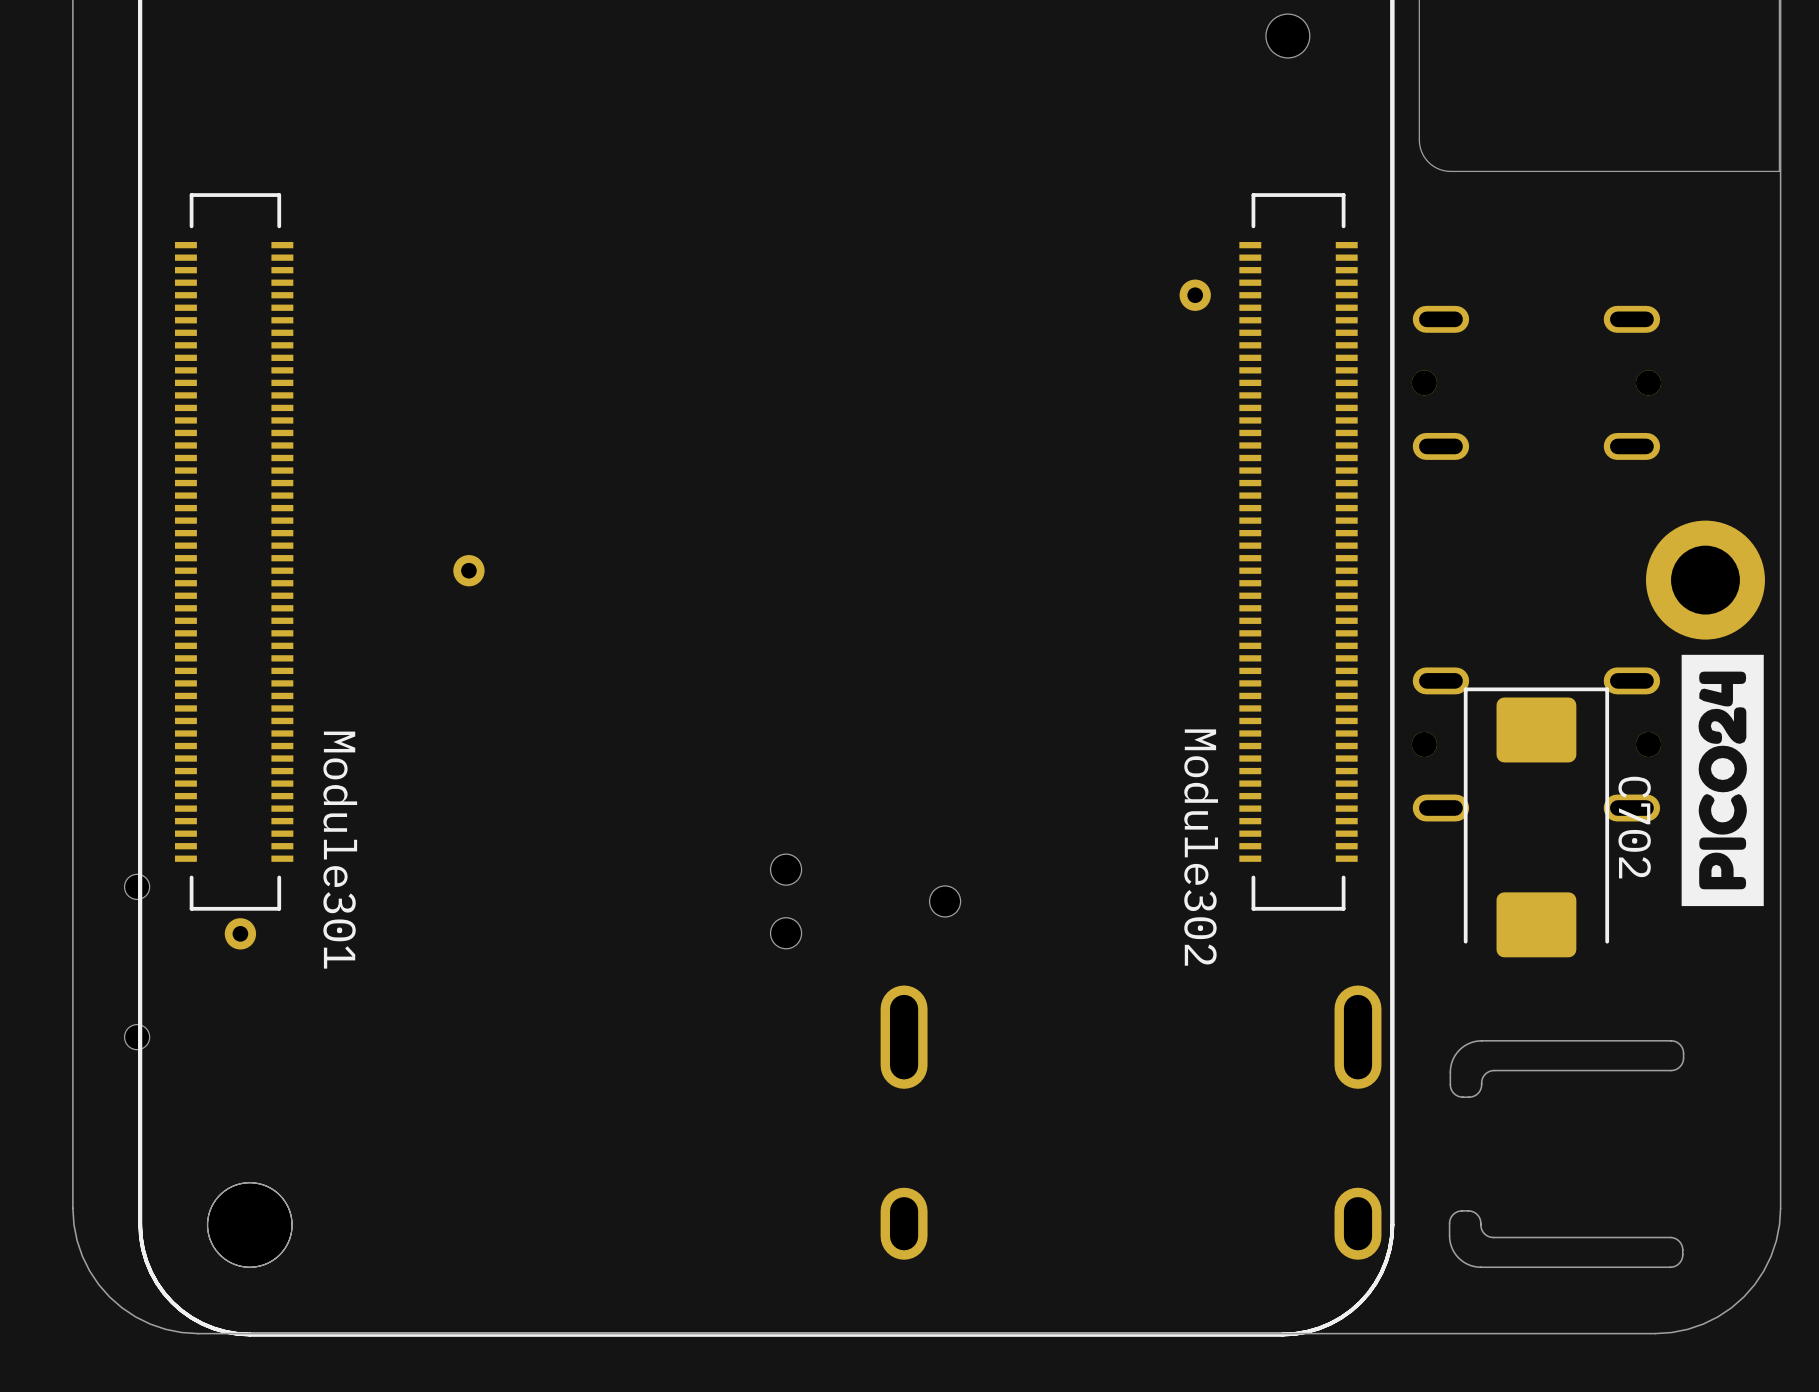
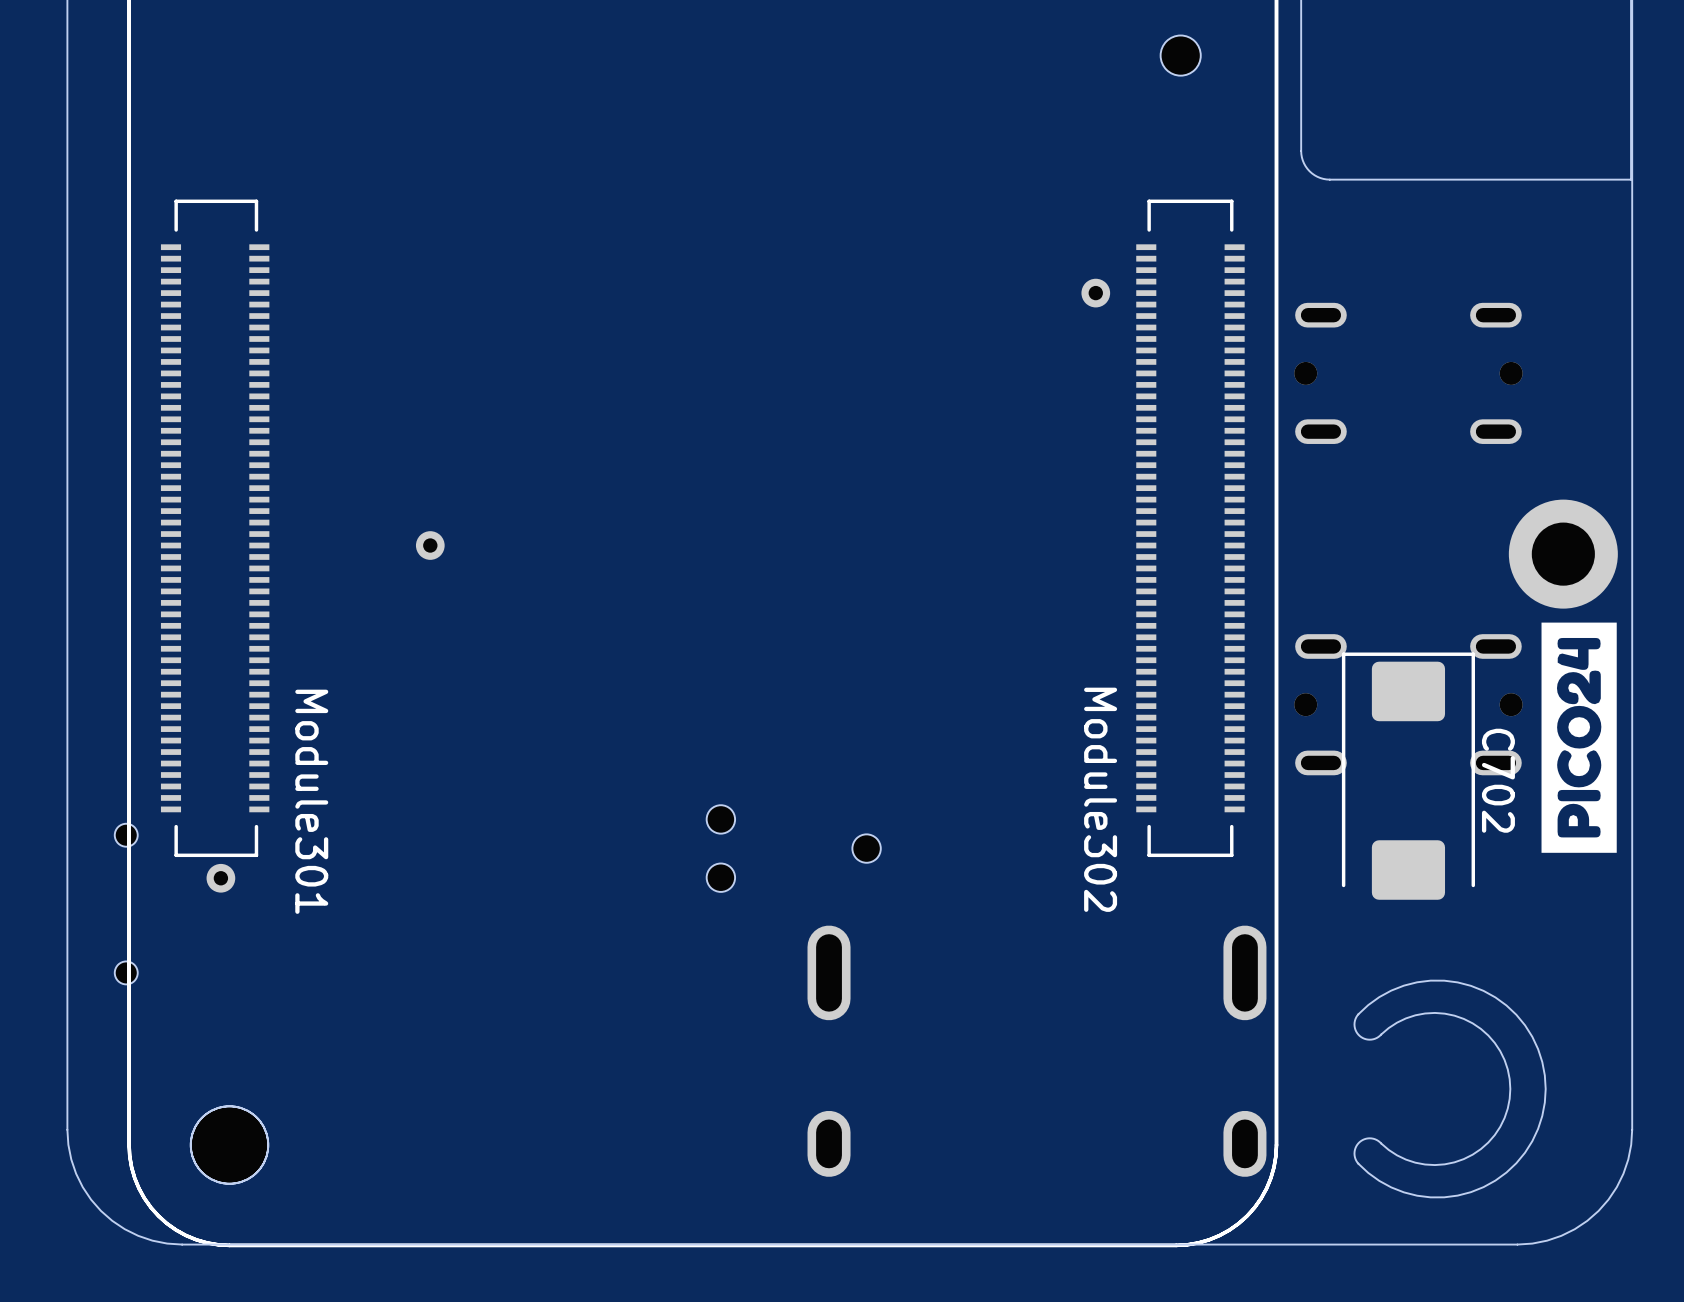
board edge: (1671, 1040) (1474, 1041) (1462, 1047) (1453, 1058) (1450, 1068) (1450, 1087) (1453, 1092) (1458, 1096) (1473, 1096) (1480, 1090) (1484, 1075) (1492, 1070) (1673, 1070) (1682, 1063) (1683, 1051) (1679, 1044) (1671, 1040) -> none
board edge: none -> (1358, 1014) (1379, 997) (1403, 985) (1430, 980) (1444, 980) (1470, 985) (1483, 990) (1495, 997) (1516, 1014) (1532, 1036) (1538, 1049) (1544, 1075) (1545, 1089) (1542, 1115) (1538, 1128) (1532, 1141) (1516, 1163) (1495, 1180) (1483, 1187) (1457, 1195) (1430, 1197) (1403, 1192) (1391, 1187) (1368, 1172) (1358, 1163) (1354, 1155) (1356, 1146) (1361, 1140) (1369, 1138) (1378, 1141) (1397, 1155) (1415, 1162) (1444, 1164) (1463, 1159) (1480, 1149) (1494, 1135) (1504, 1117) (1510, 1089) (1507, 1069) (1494, 1042) (1480, 1028) (1463, 1018) (1444, 1013) (1415, 1015) (1397, 1022) (1378, 1036) (1369, 1039) (1361, 1037) (1355, 1029) (1354, 1020) (1358, 1014)
board edge: (1468, 1210) (1457, 1211) (1451, 1216) (1449, 1239) (1456, 1255) (1464, 1262) (1473, 1266) (1670, 1267) (1678, 1264) (1682, 1257) (1681, 1244) (1678, 1240) (1671, 1237) (1490, 1237) (1482, 1231) (1478, 1215) (1468, 1210) -> none

